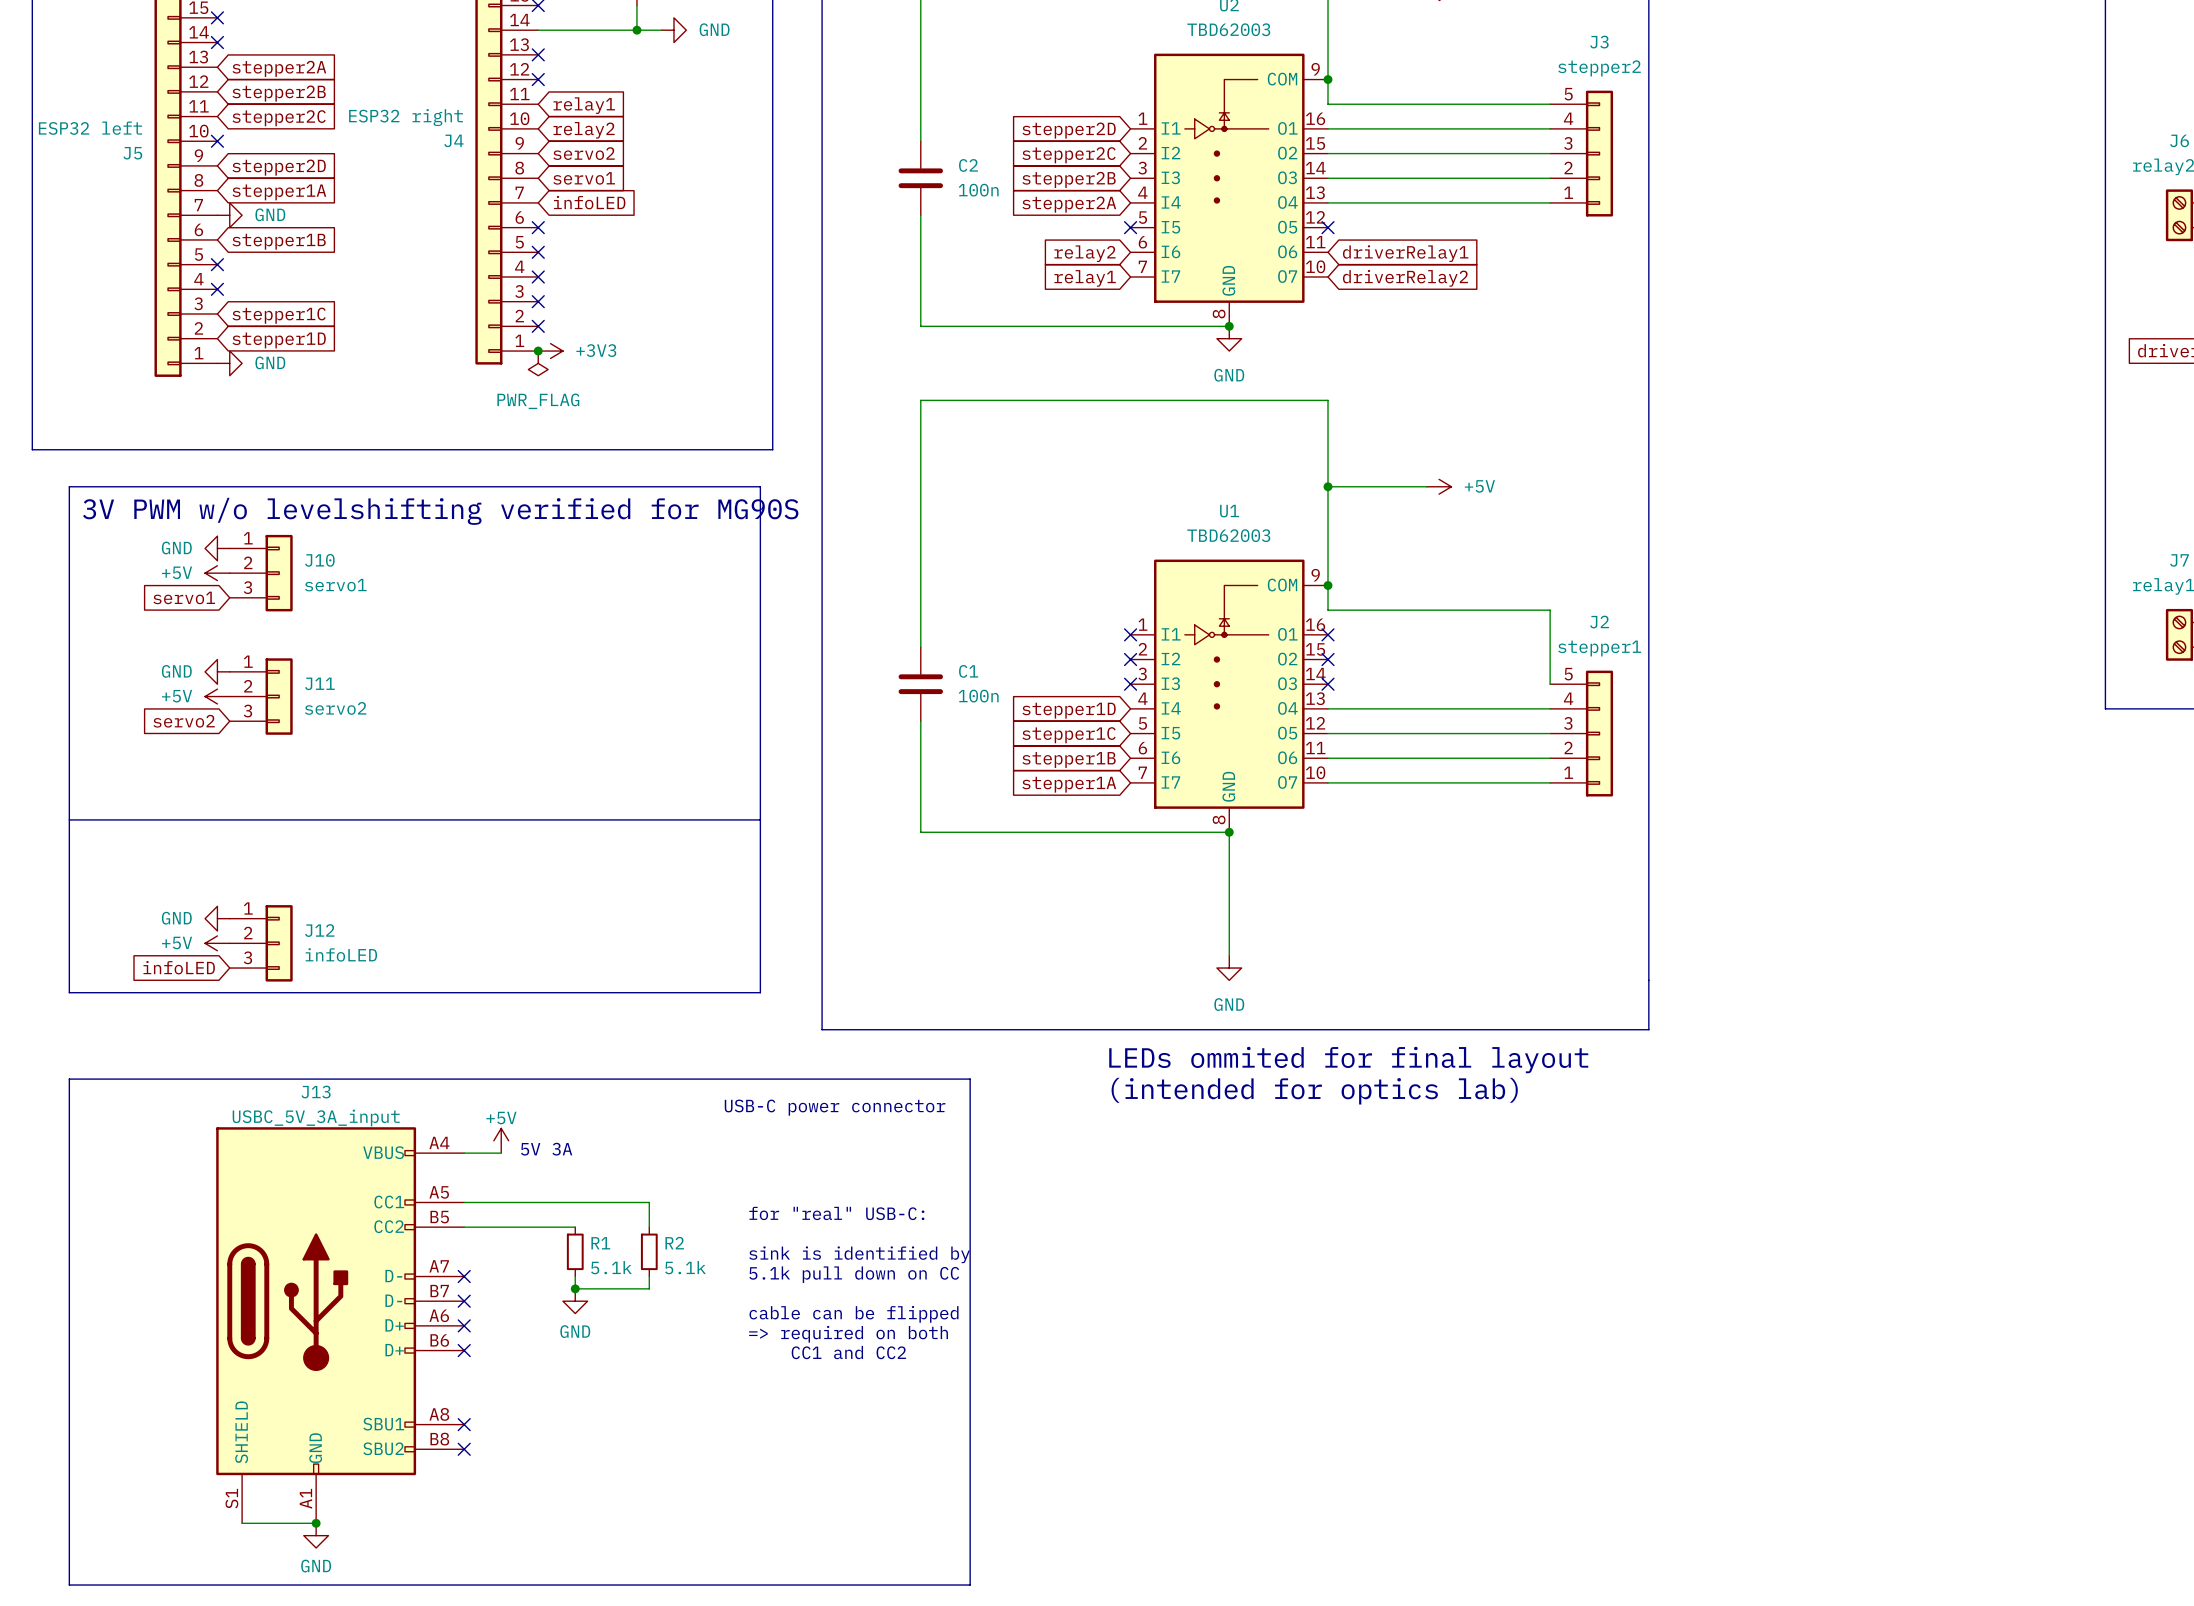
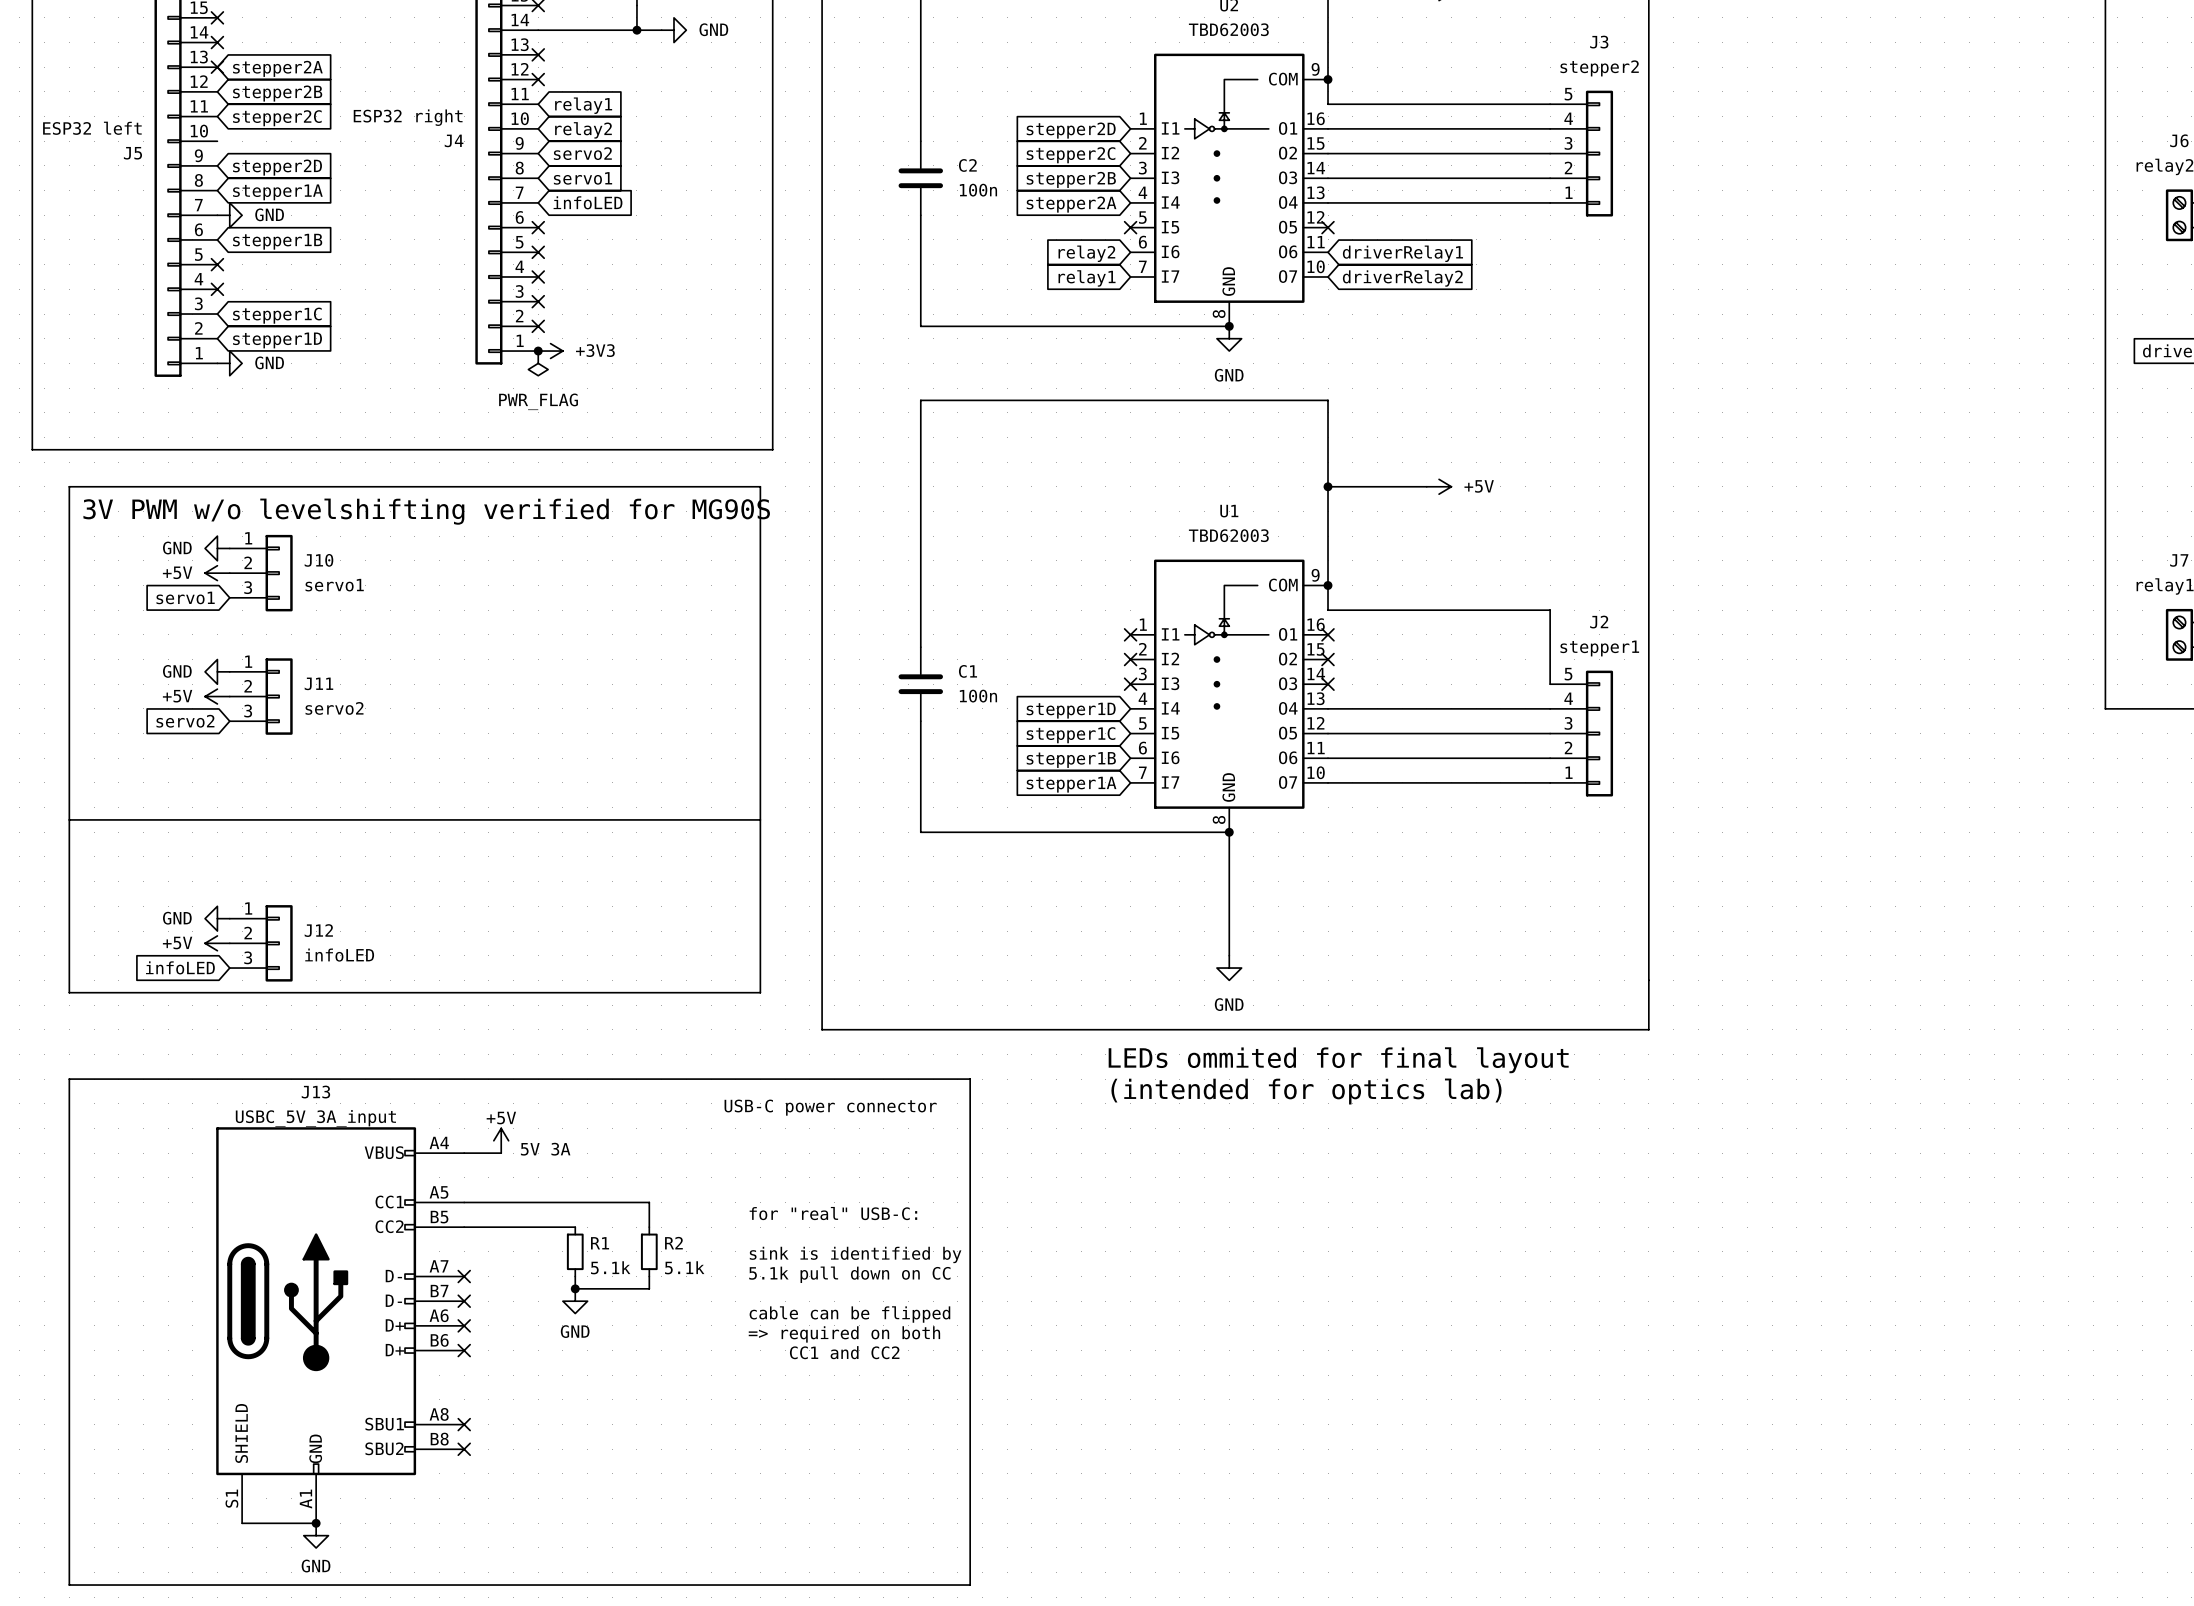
no-connect mark: none -> (217, 67)
no-connect mark: (217, 141) -> none

